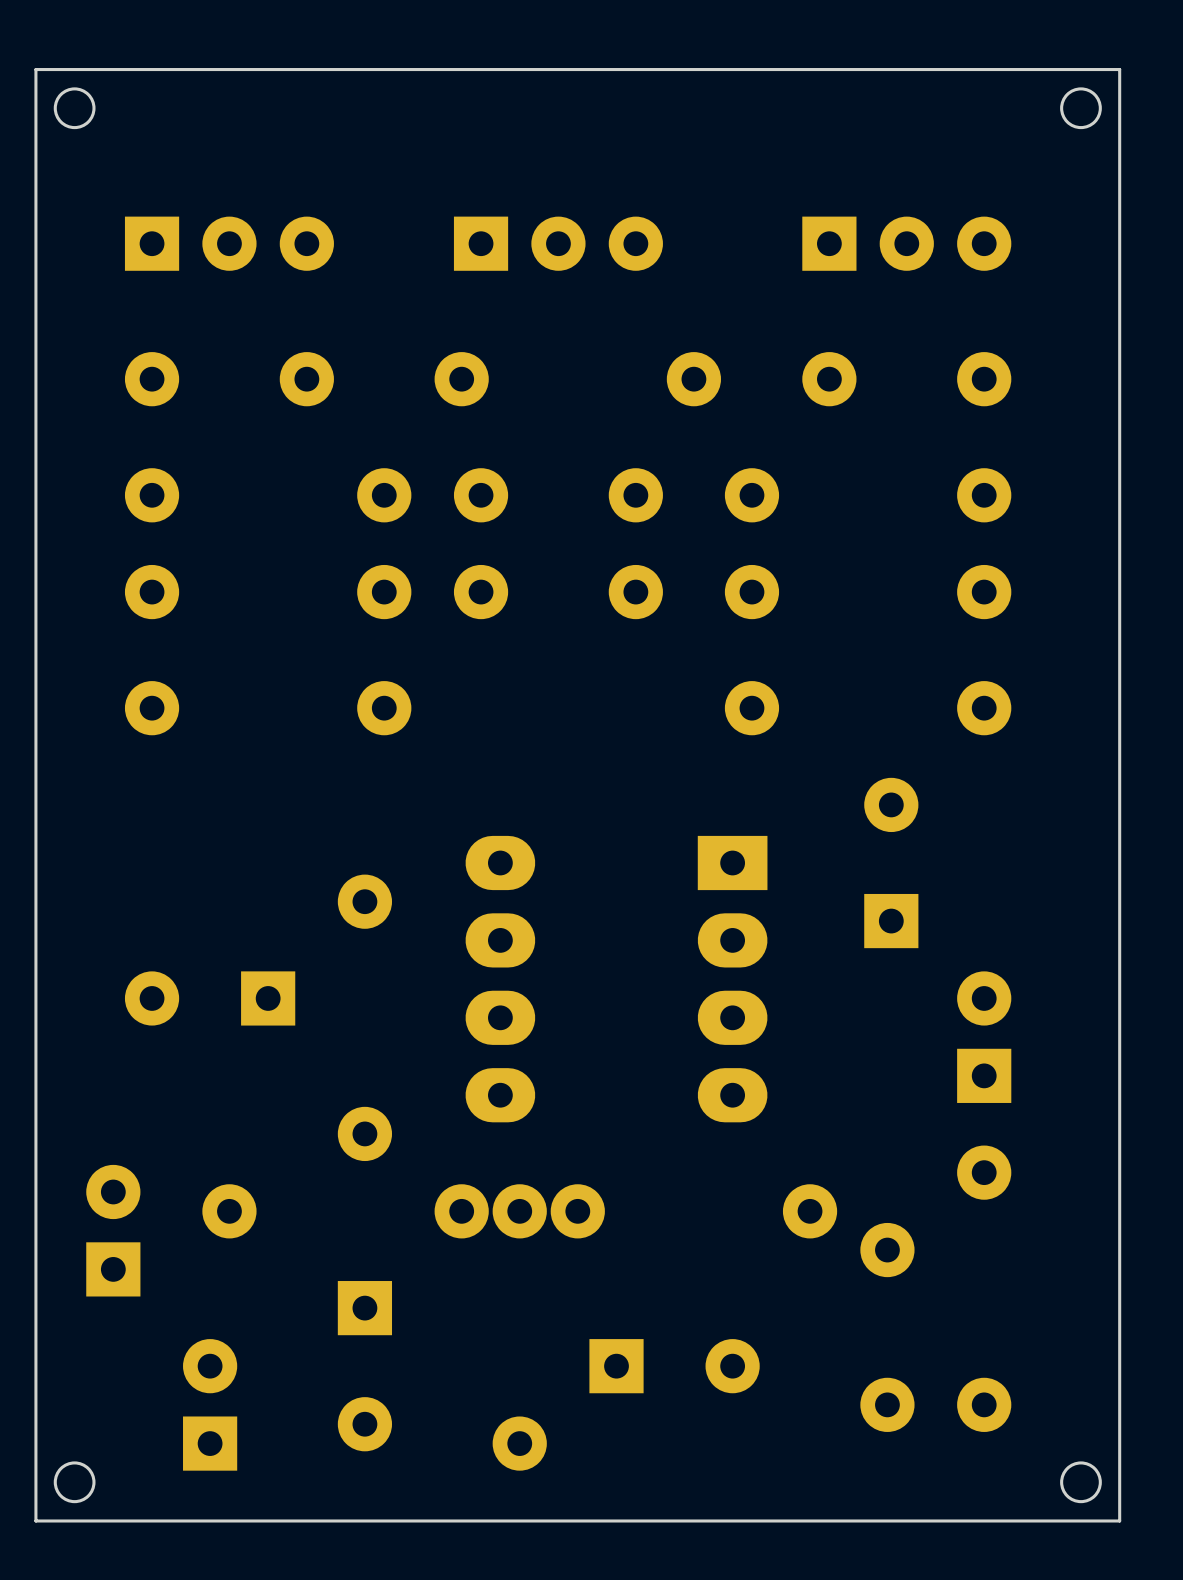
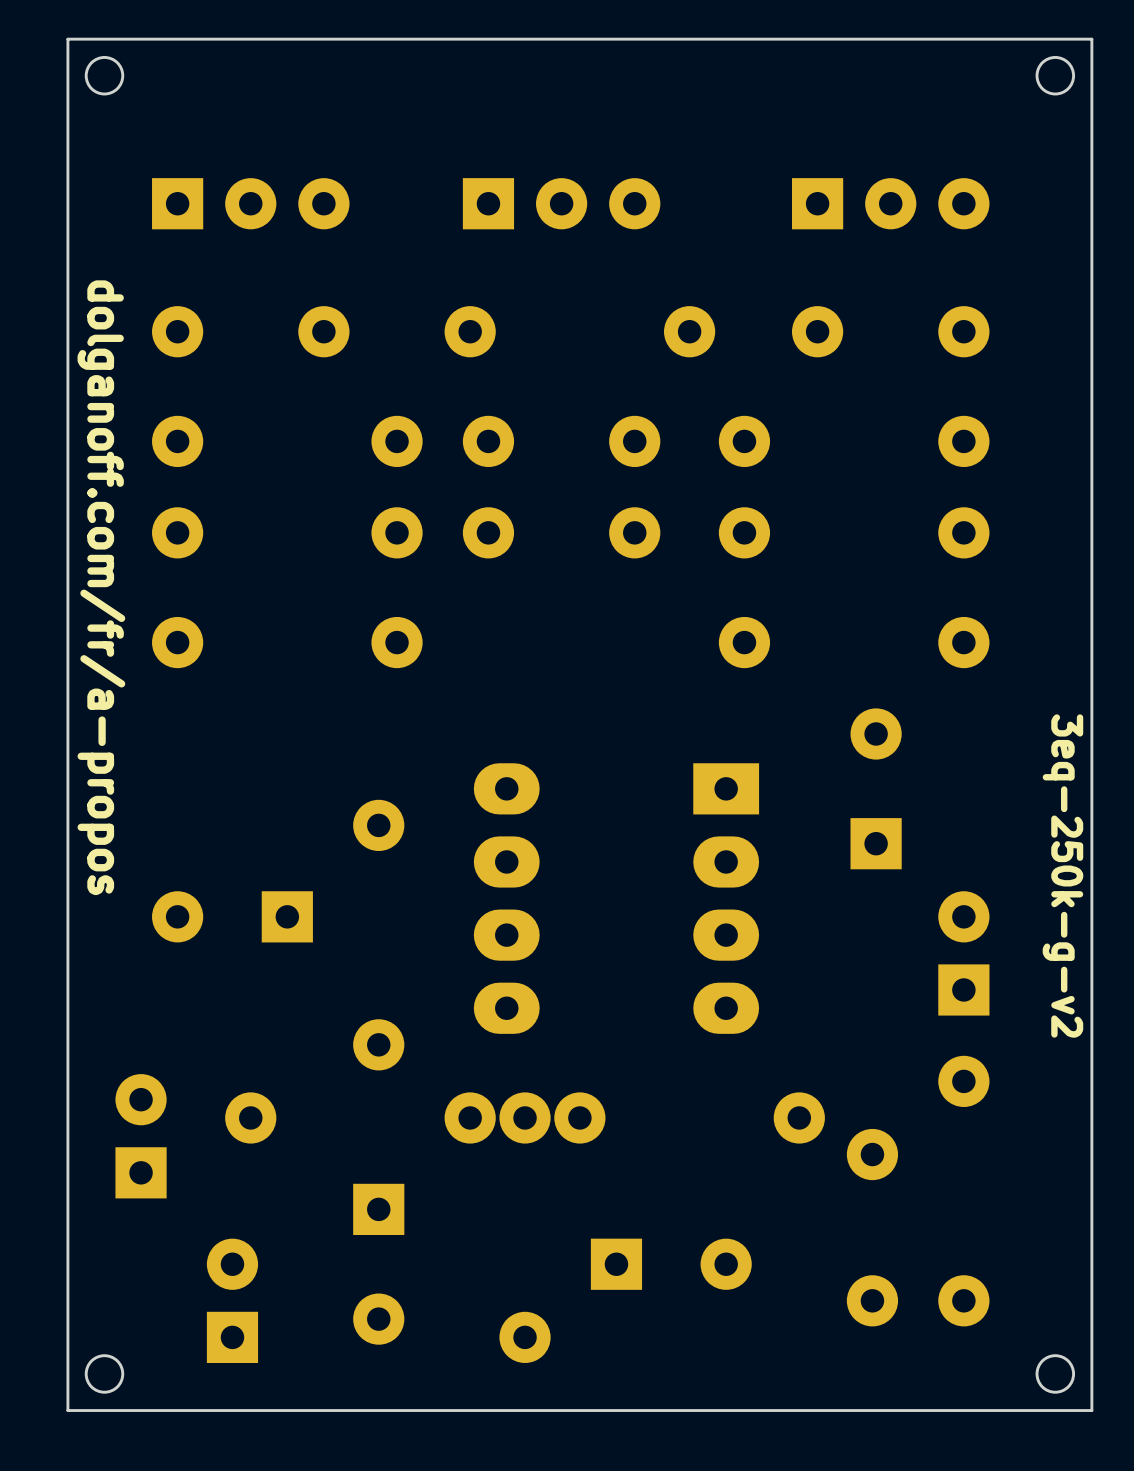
text: none -> dolganoff.com/fr/a-propos (101, 587)
text: none -> 3eq-250k-g-v2 (1062, 876)

